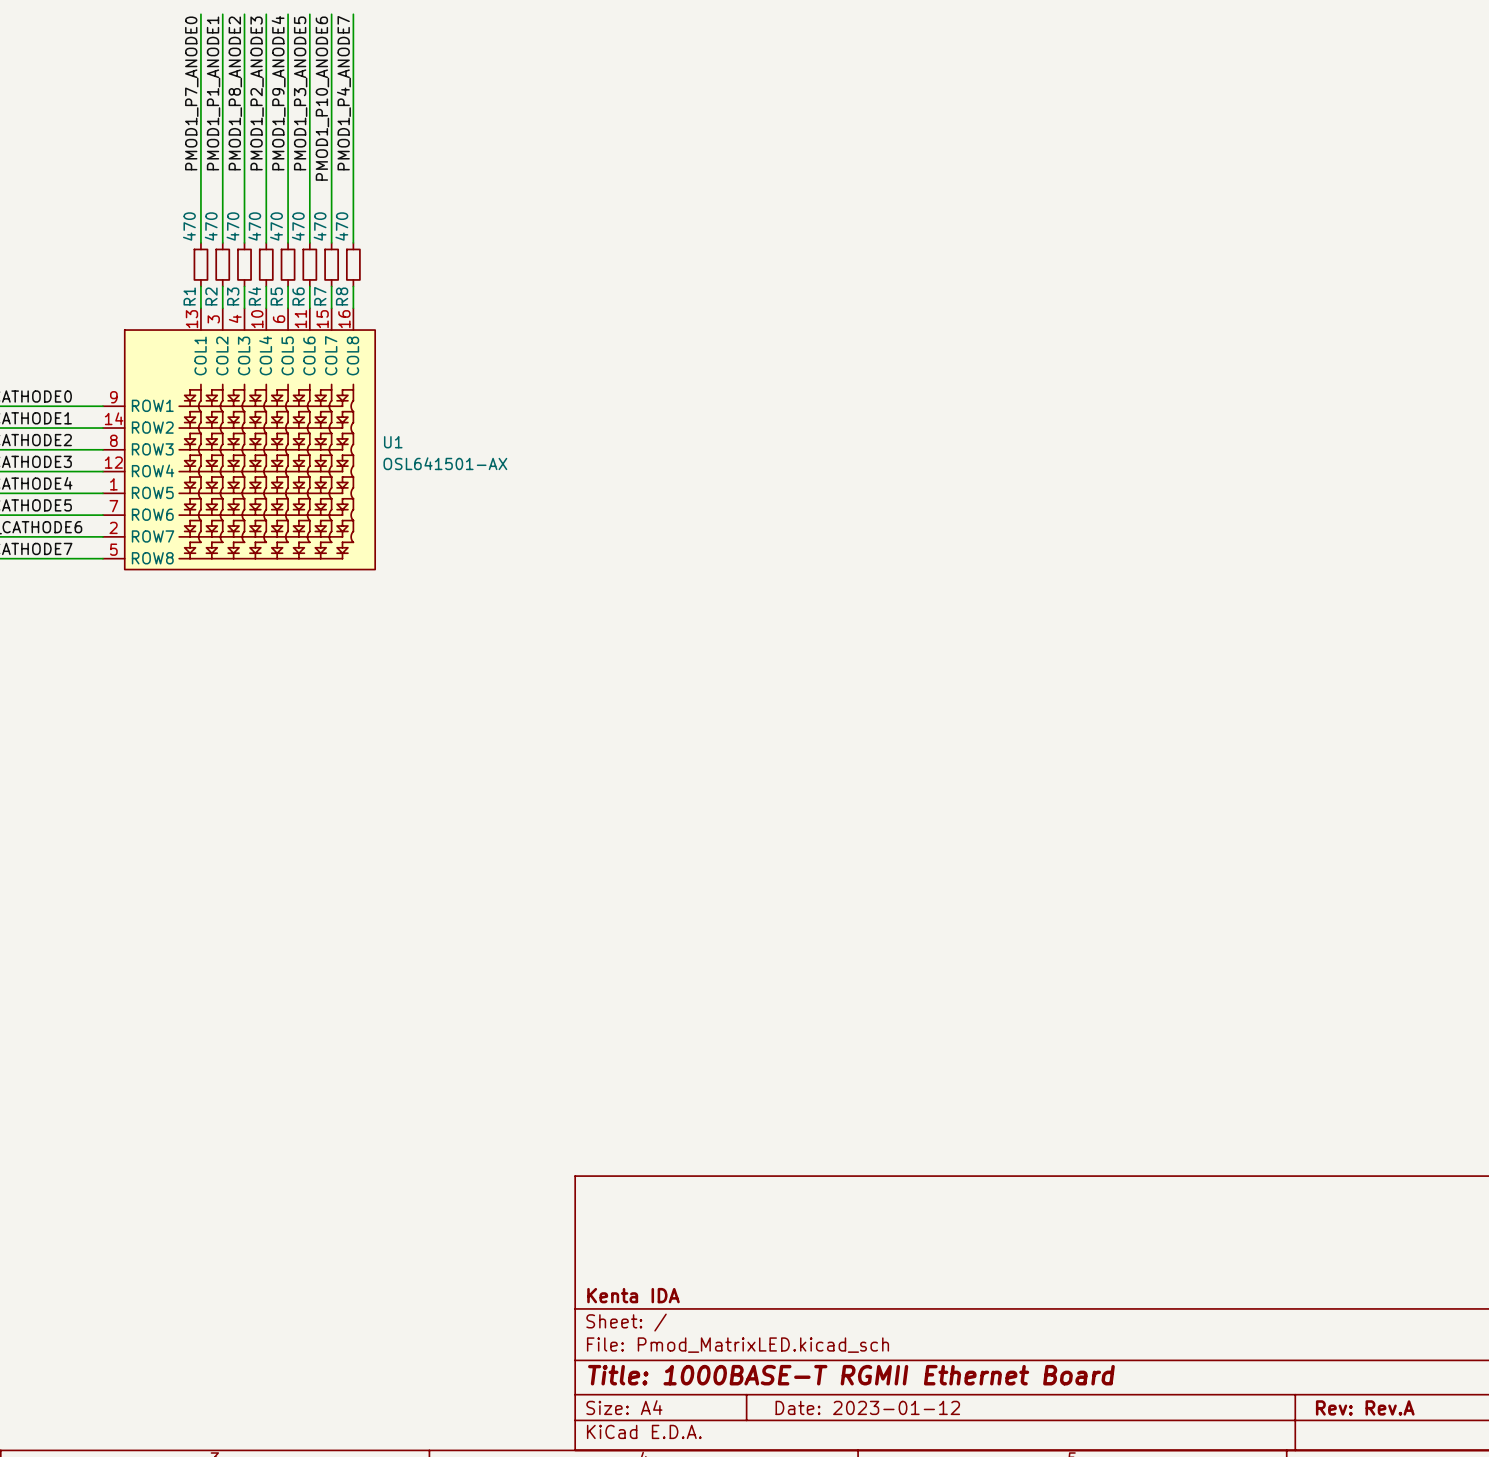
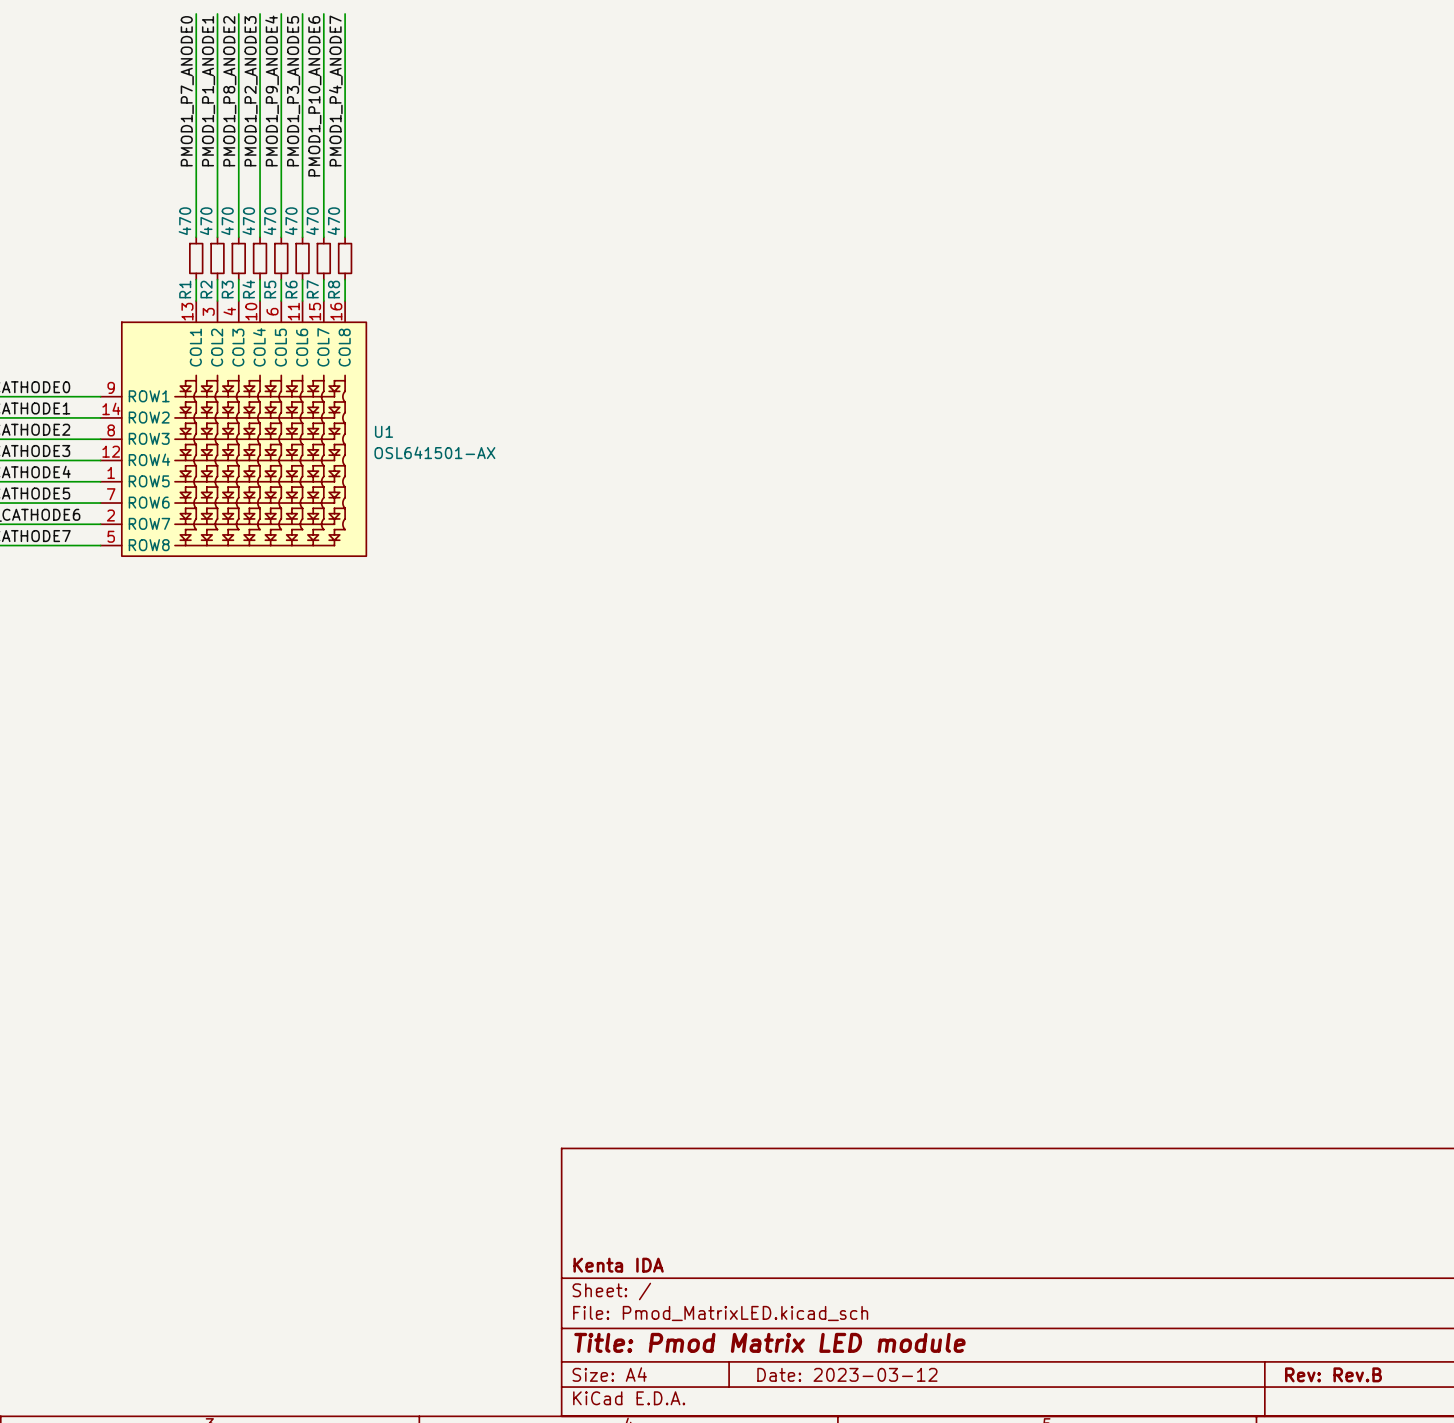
title block: Title: 1000BASE-T RGMII Ethernet Board (851, 1375) -> Title: Pmod Matrix LED module (769, 1342)
title block: Date: 2023-01-12 (867, 1407) -> Date: 2023-03-12 (847, 1374)
title block: Rev: Rev.A (1365, 1407) -> Rev: Rev.B (1333, 1374)

